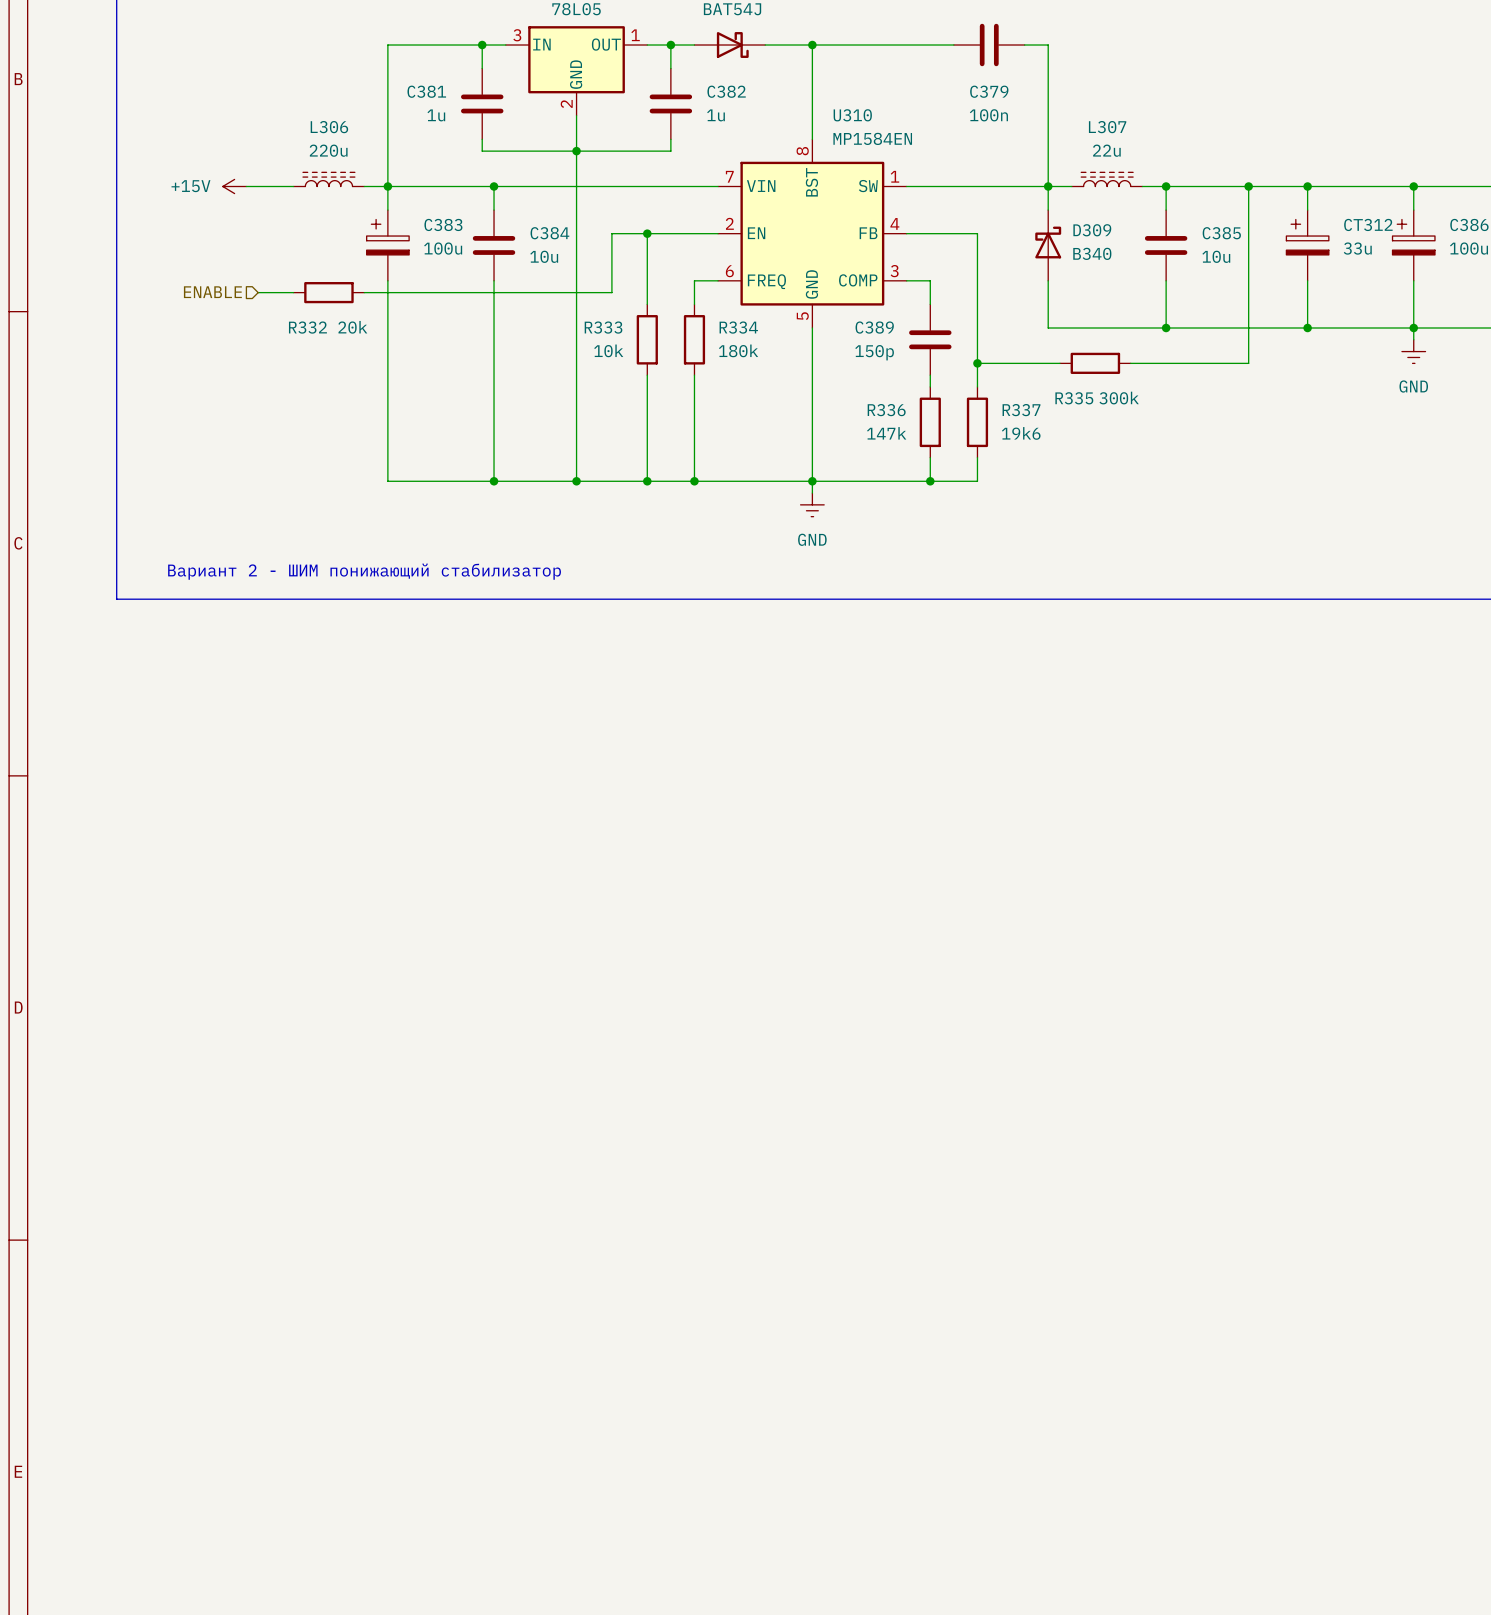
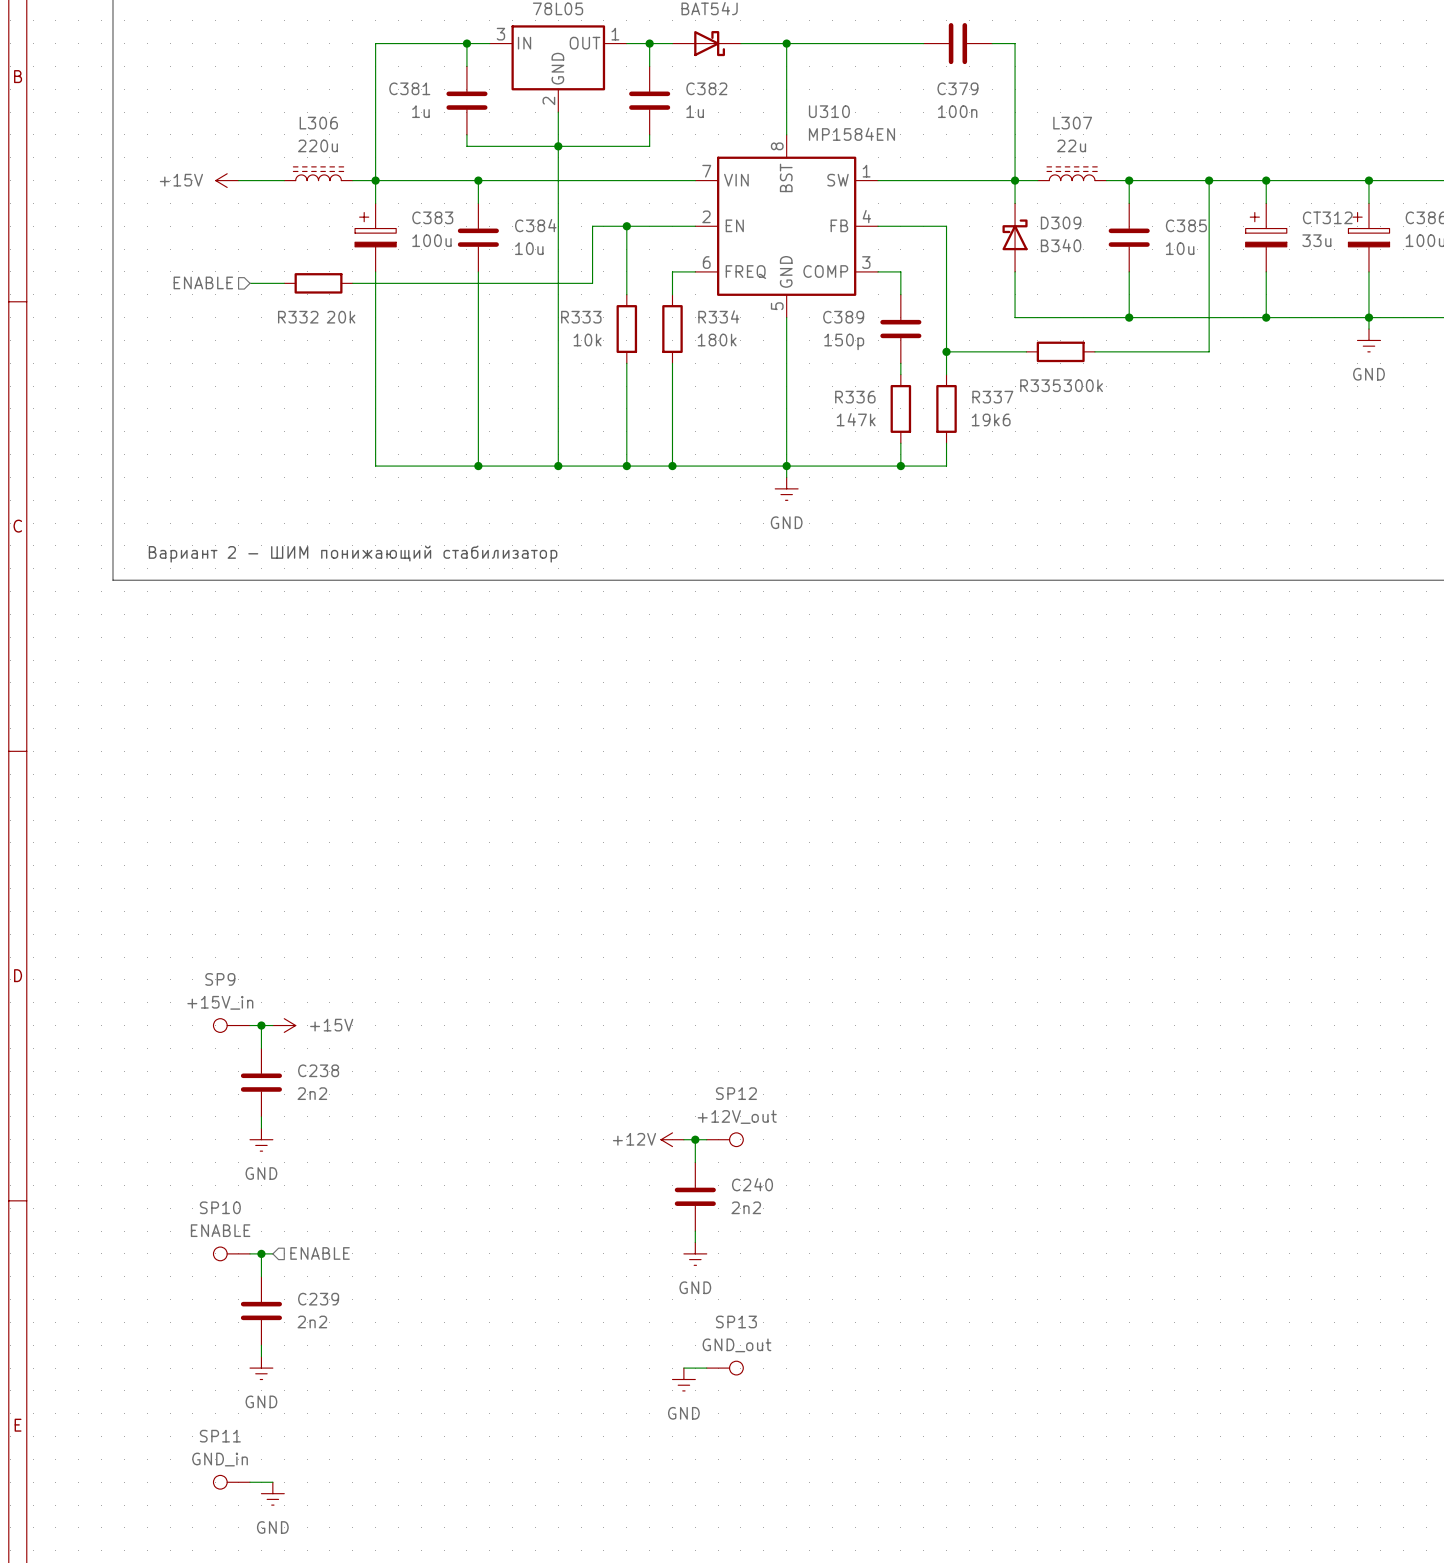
SP9: none -> +15V_in (231, 1025)
wire: none -> (250, 1025) (272, 1025)
wire: none -> (261, 1025) (261, 1048)
junction: none -> (261, 1025)
power symbol: none -> +15V (284, 1025)
C238: none -> 2n2 (261, 1082)
wire: none -> (261, 1116) (261, 1128)
power symbol: none -> GND (261, 1139)
power symbol: none -> +12V (672, 1139)
wire: none -> (683, 1139) (706, 1139)
wire: none -> (695, 1139) (695, 1162)
junction: none -> (695, 1139)
SP12: none -> +12V_out (725, 1139)
C240: none -> 2n2 (695, 1196)
wire: none -> (695, 1231) (695, 1242)
SP10: none -> ENABLE (231, 1253)
wire: none -> (250, 1253) (272, 1253)
wire: none -> (261, 1253) (261, 1276)
junction: none -> (261, 1253)
hierarchical label: none -> ENABLE (320, 1253)
power symbol: none -> GND (695, 1253)
C239: none -> 2n2 (261, 1310)
wire: none -> (261, 1345) (261, 1356)
power symbol: none -> GND (261, 1368)
wire: none -> (683, 1368) (706, 1368)
SP13: none -> GND_out (725, 1368)
power symbol: none -> GND (683, 1379)
SP11: none -> GND_in (231, 1482)
wire: none -> (250, 1482) (272, 1482)
power symbol: none -> GND (272, 1493)

